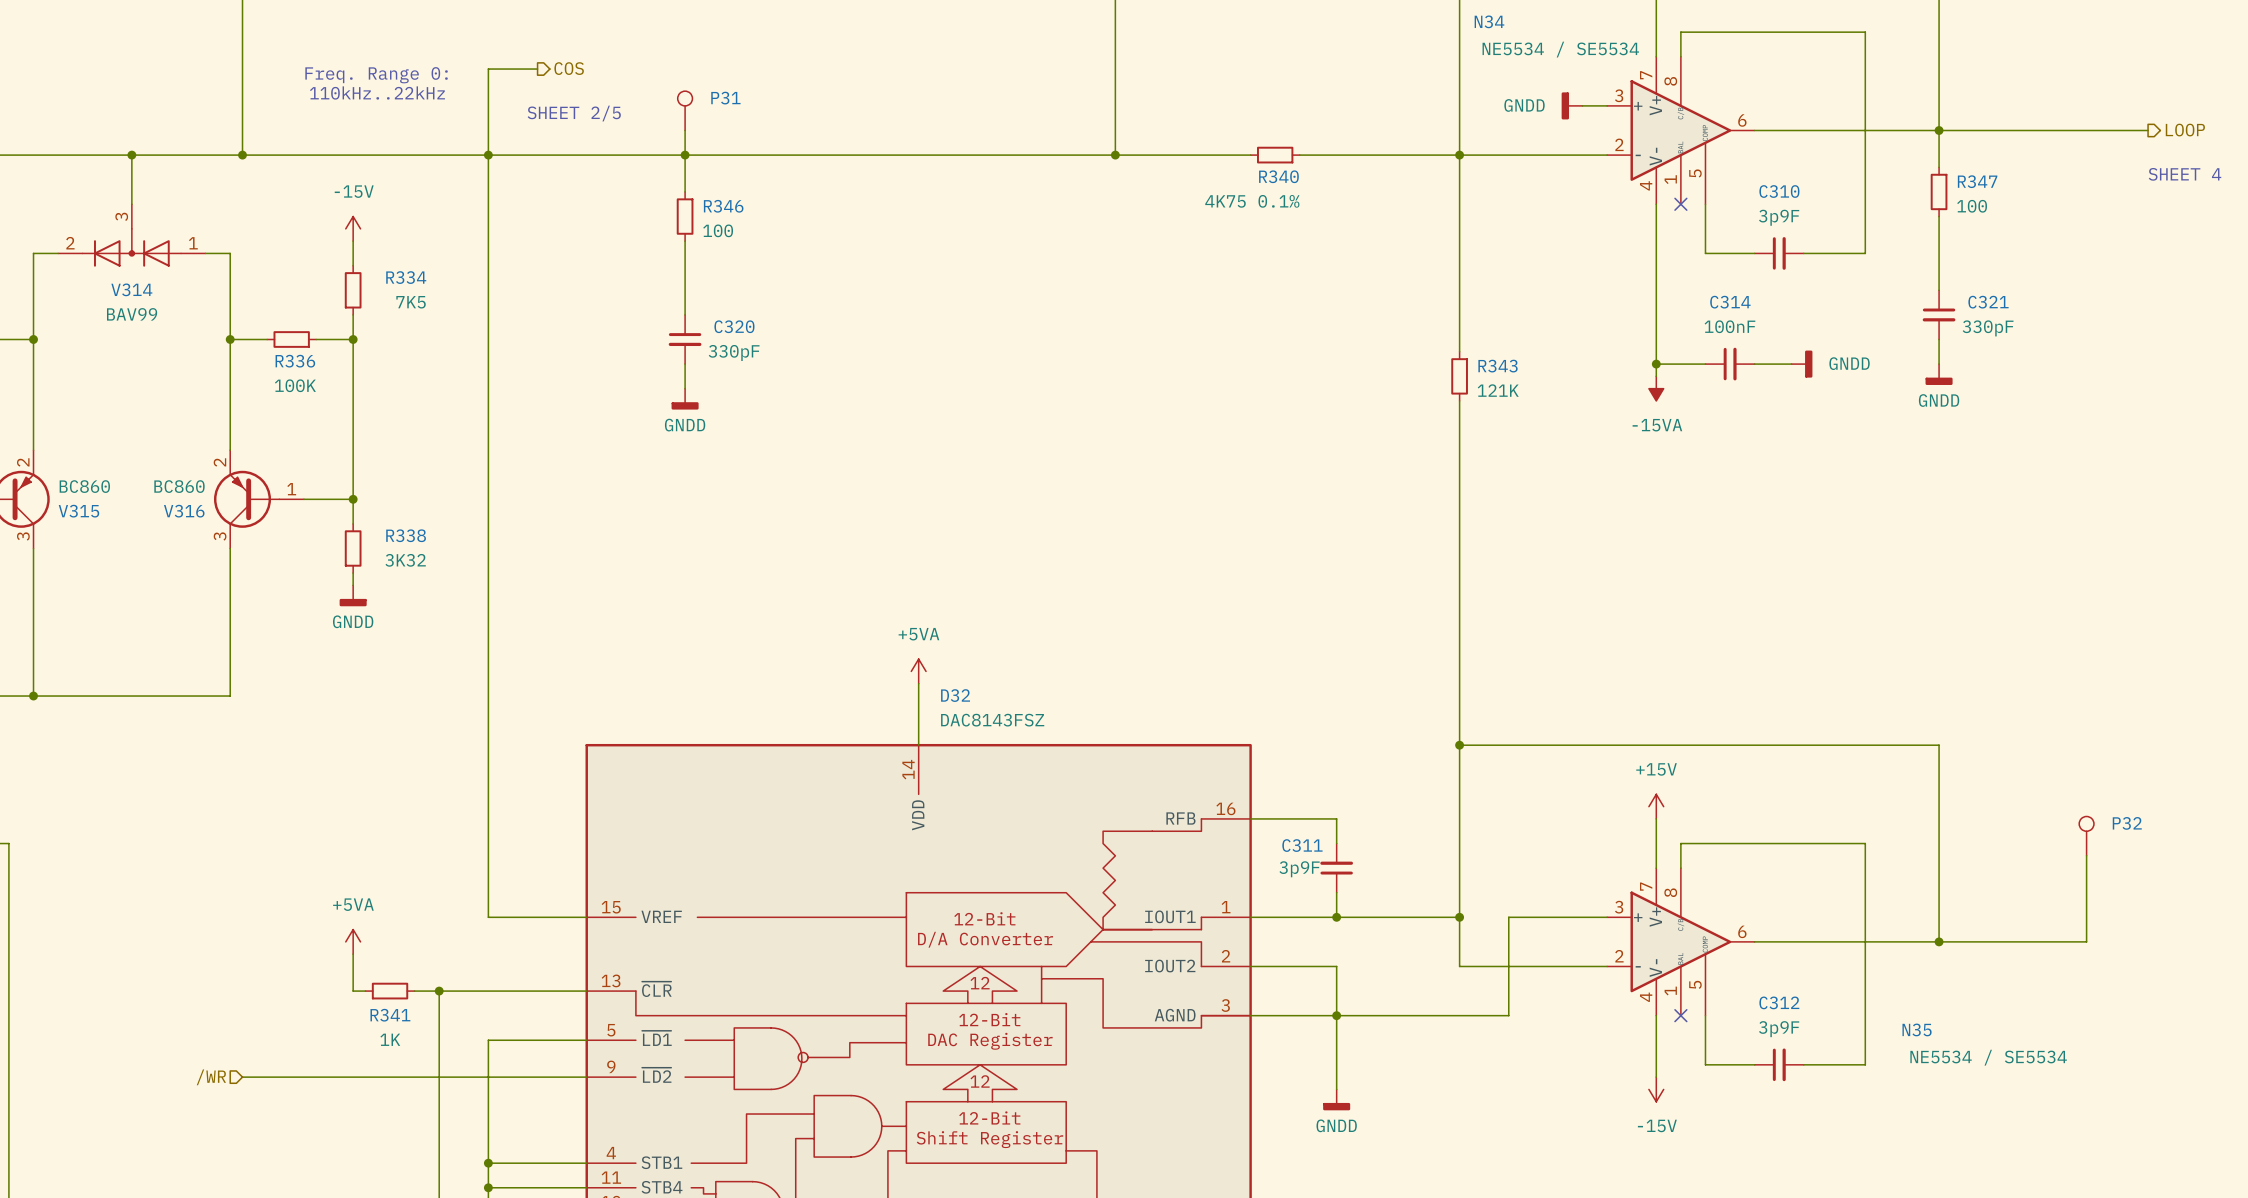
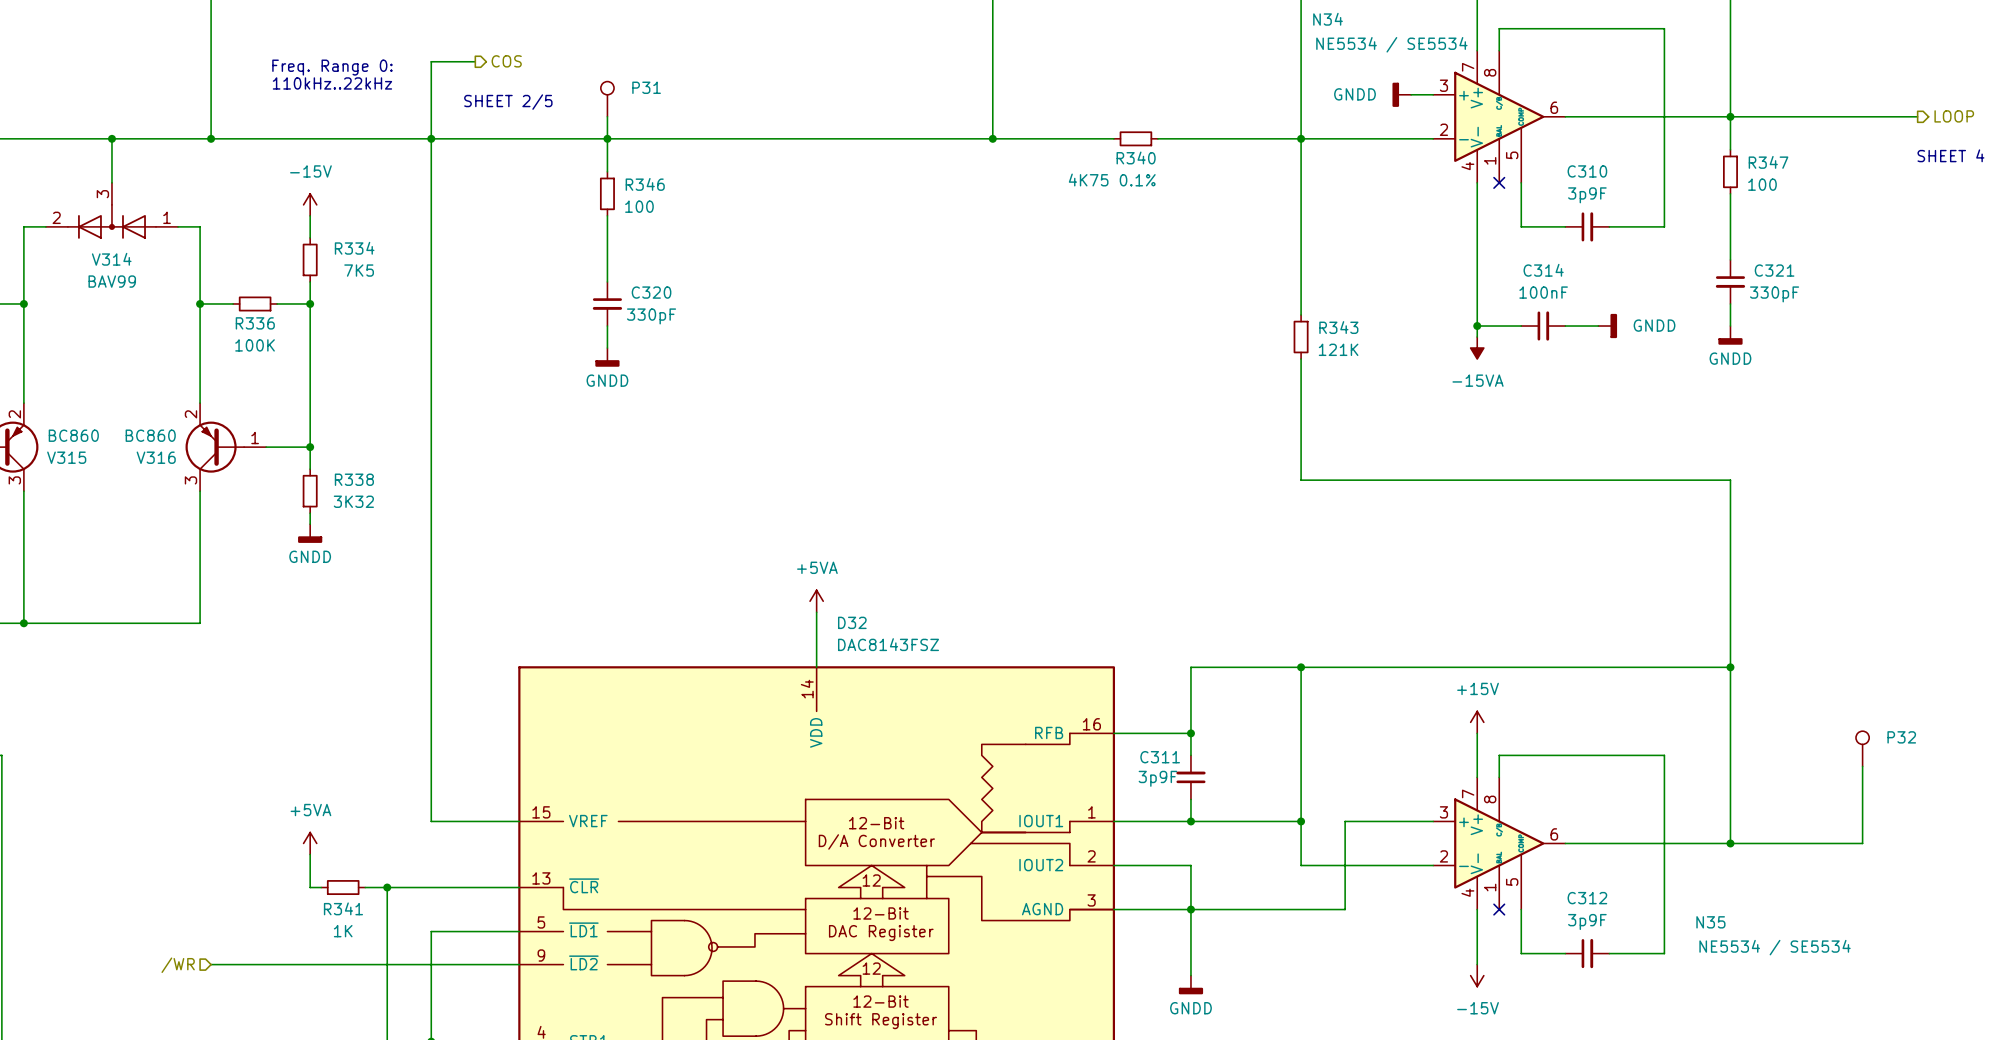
wire: (1459, 536) (1459, 745) -> (1190, 733) (1190, 667) (1301, 667)
wire: none -> (1301, 480) (1730, 480) (1730, 667)
junction: none -> (1730, 667)
junction: none -> (1190, 733)

